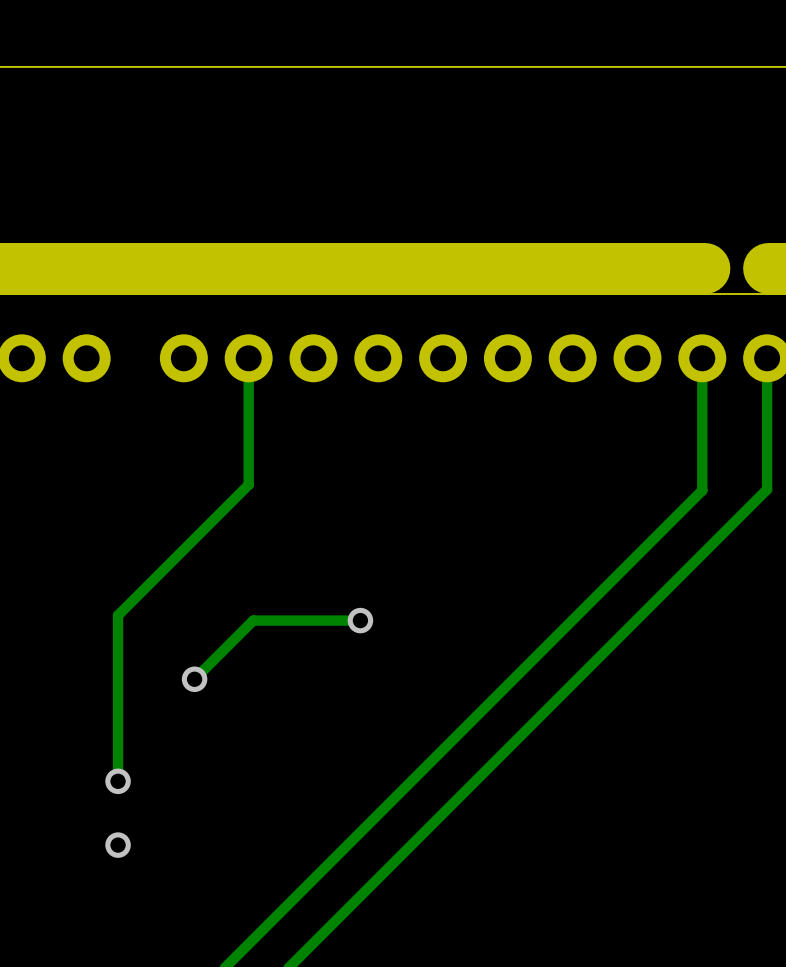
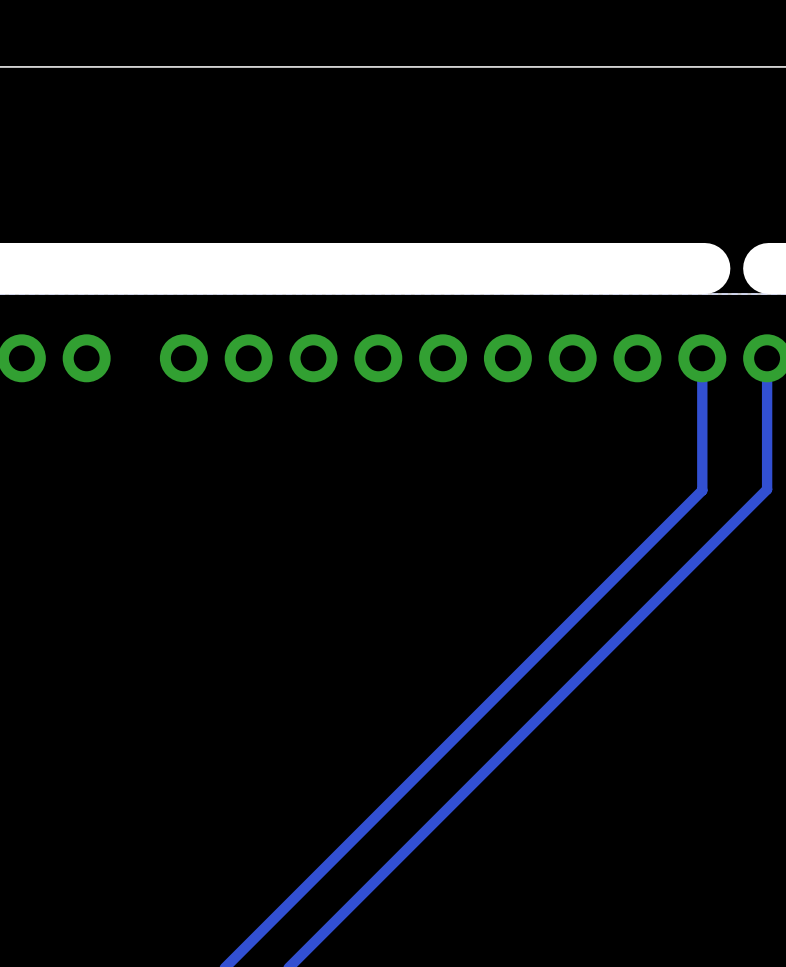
track: (248, 358) (248, 484) (118, 615) (118, 781) -> none
track: (360, 620) (253, 620) (194, 679) -> none
via: (360, 620) -> none
via: (194, 679) -> none
via: (118, 781) -> none
via: (118, 845) -> none

